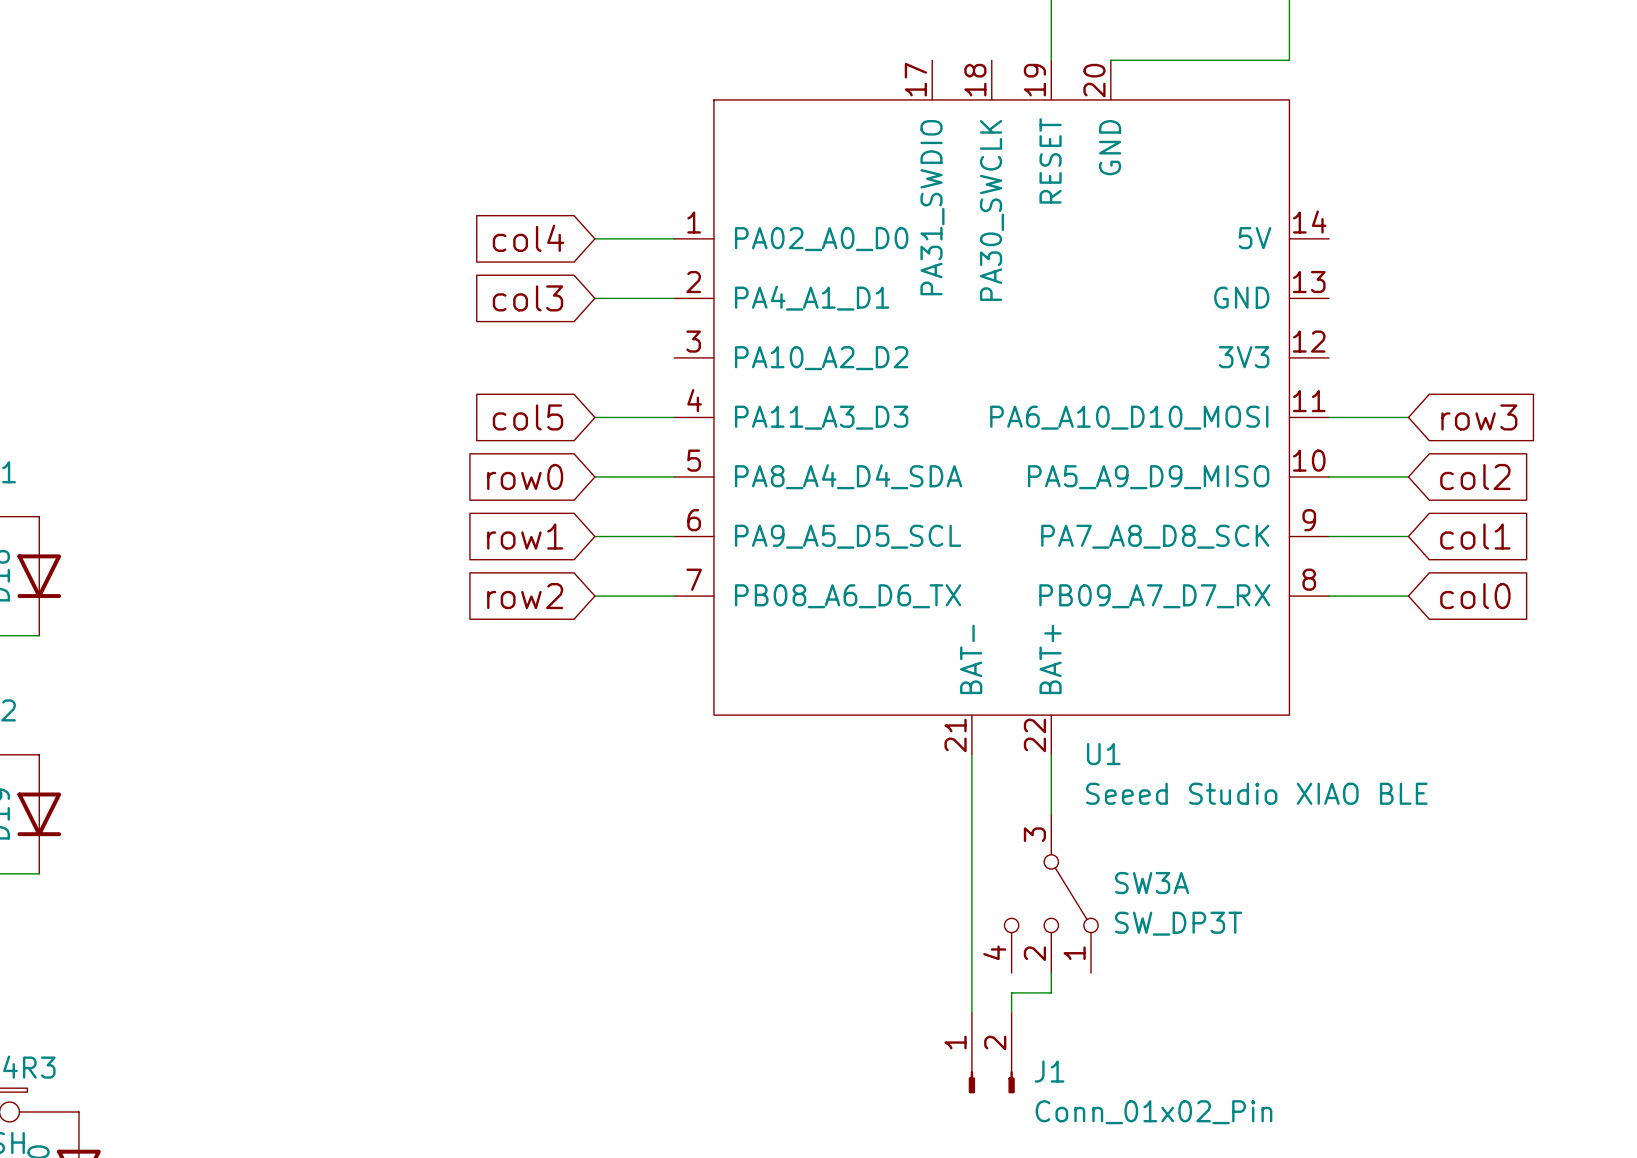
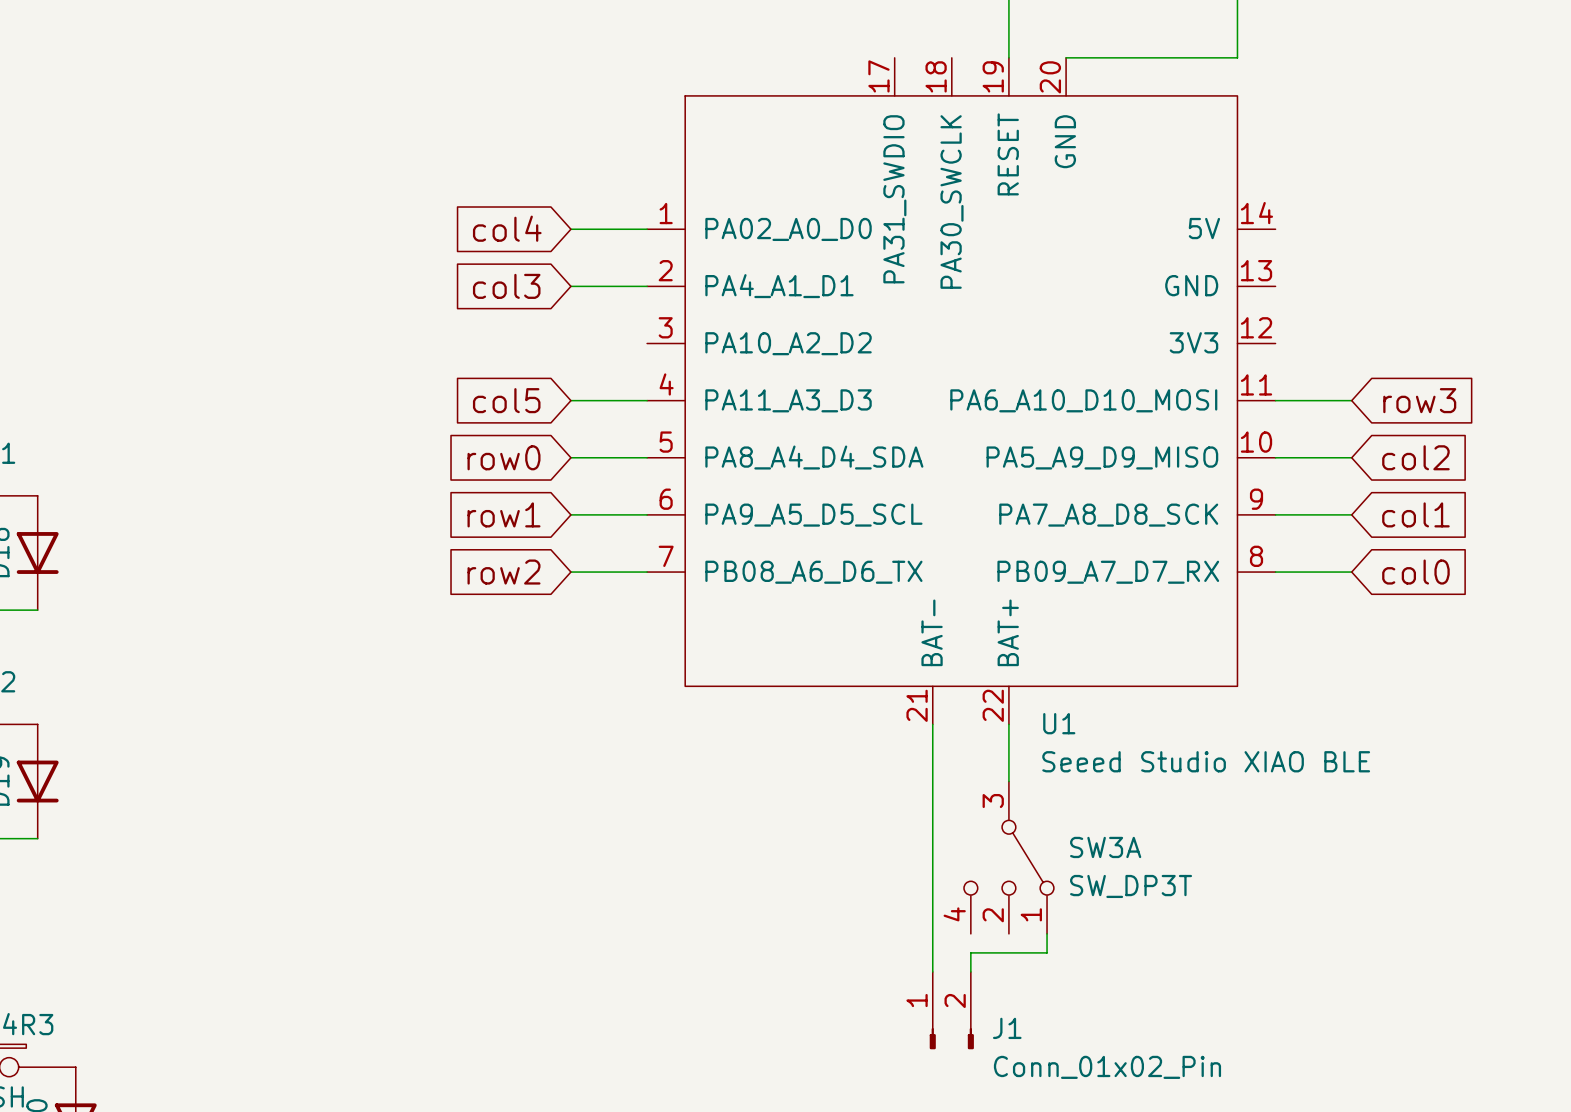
wire: (1051, 973) (1051, 992) -> (1047, 933) (1047, 952) (1008, 952)

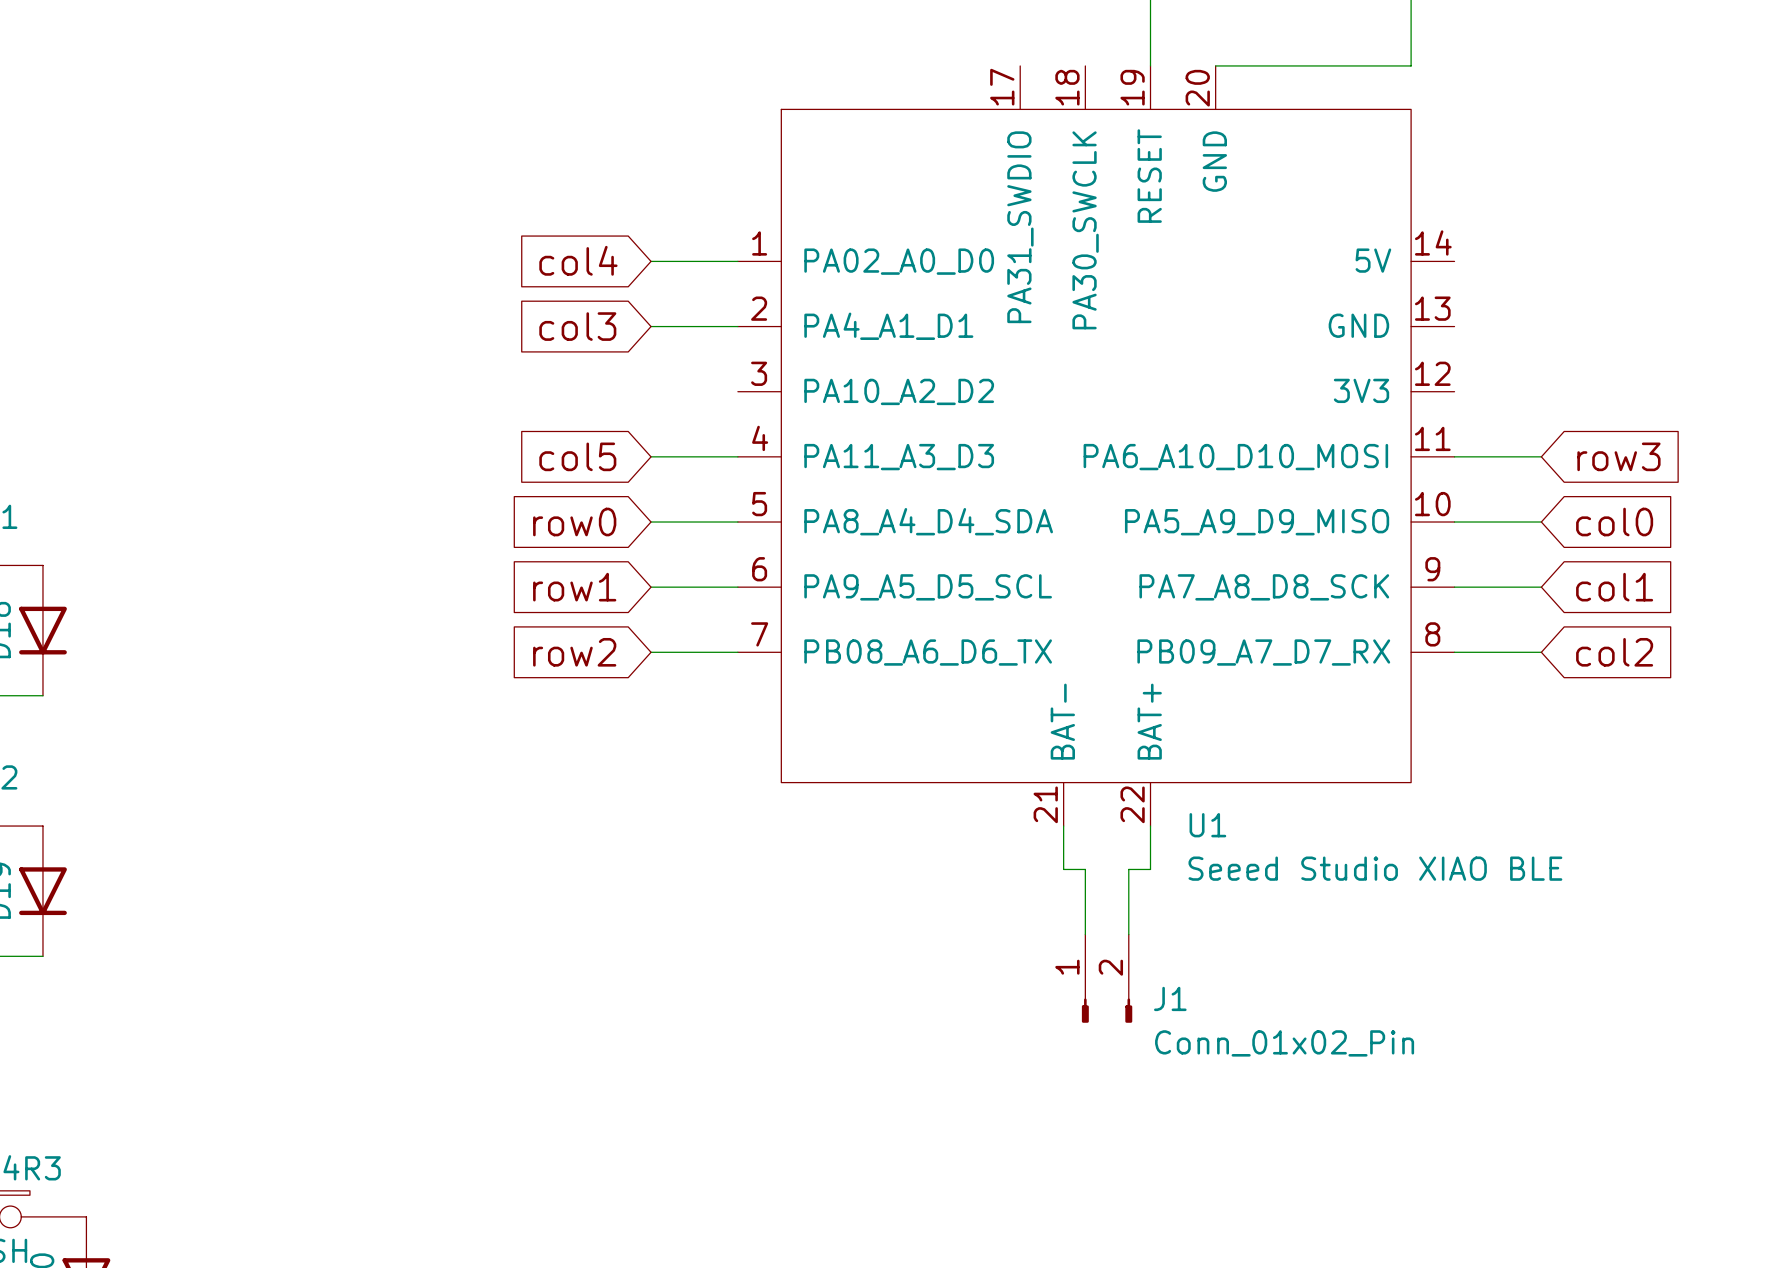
global label: col2 (1415, 457) -> col0 (1614, 522)
global label: col0 (1415, 572) -> col2 (1614, 652)
wire: (932, 762) (932, 971) -> (1063, 869) (1085, 869) (1085, 934)
wire: (1008, 762) (1008, 781) -> (1150, 869) (1128, 869) (1128, 934)
SW3A: SW_DP3T (1008, 857) -> none
wire: (1047, 933) (1047, 952) (970, 952) (970, 971) -> none
J1 position: (951, 1010) -> (1107, 978)

